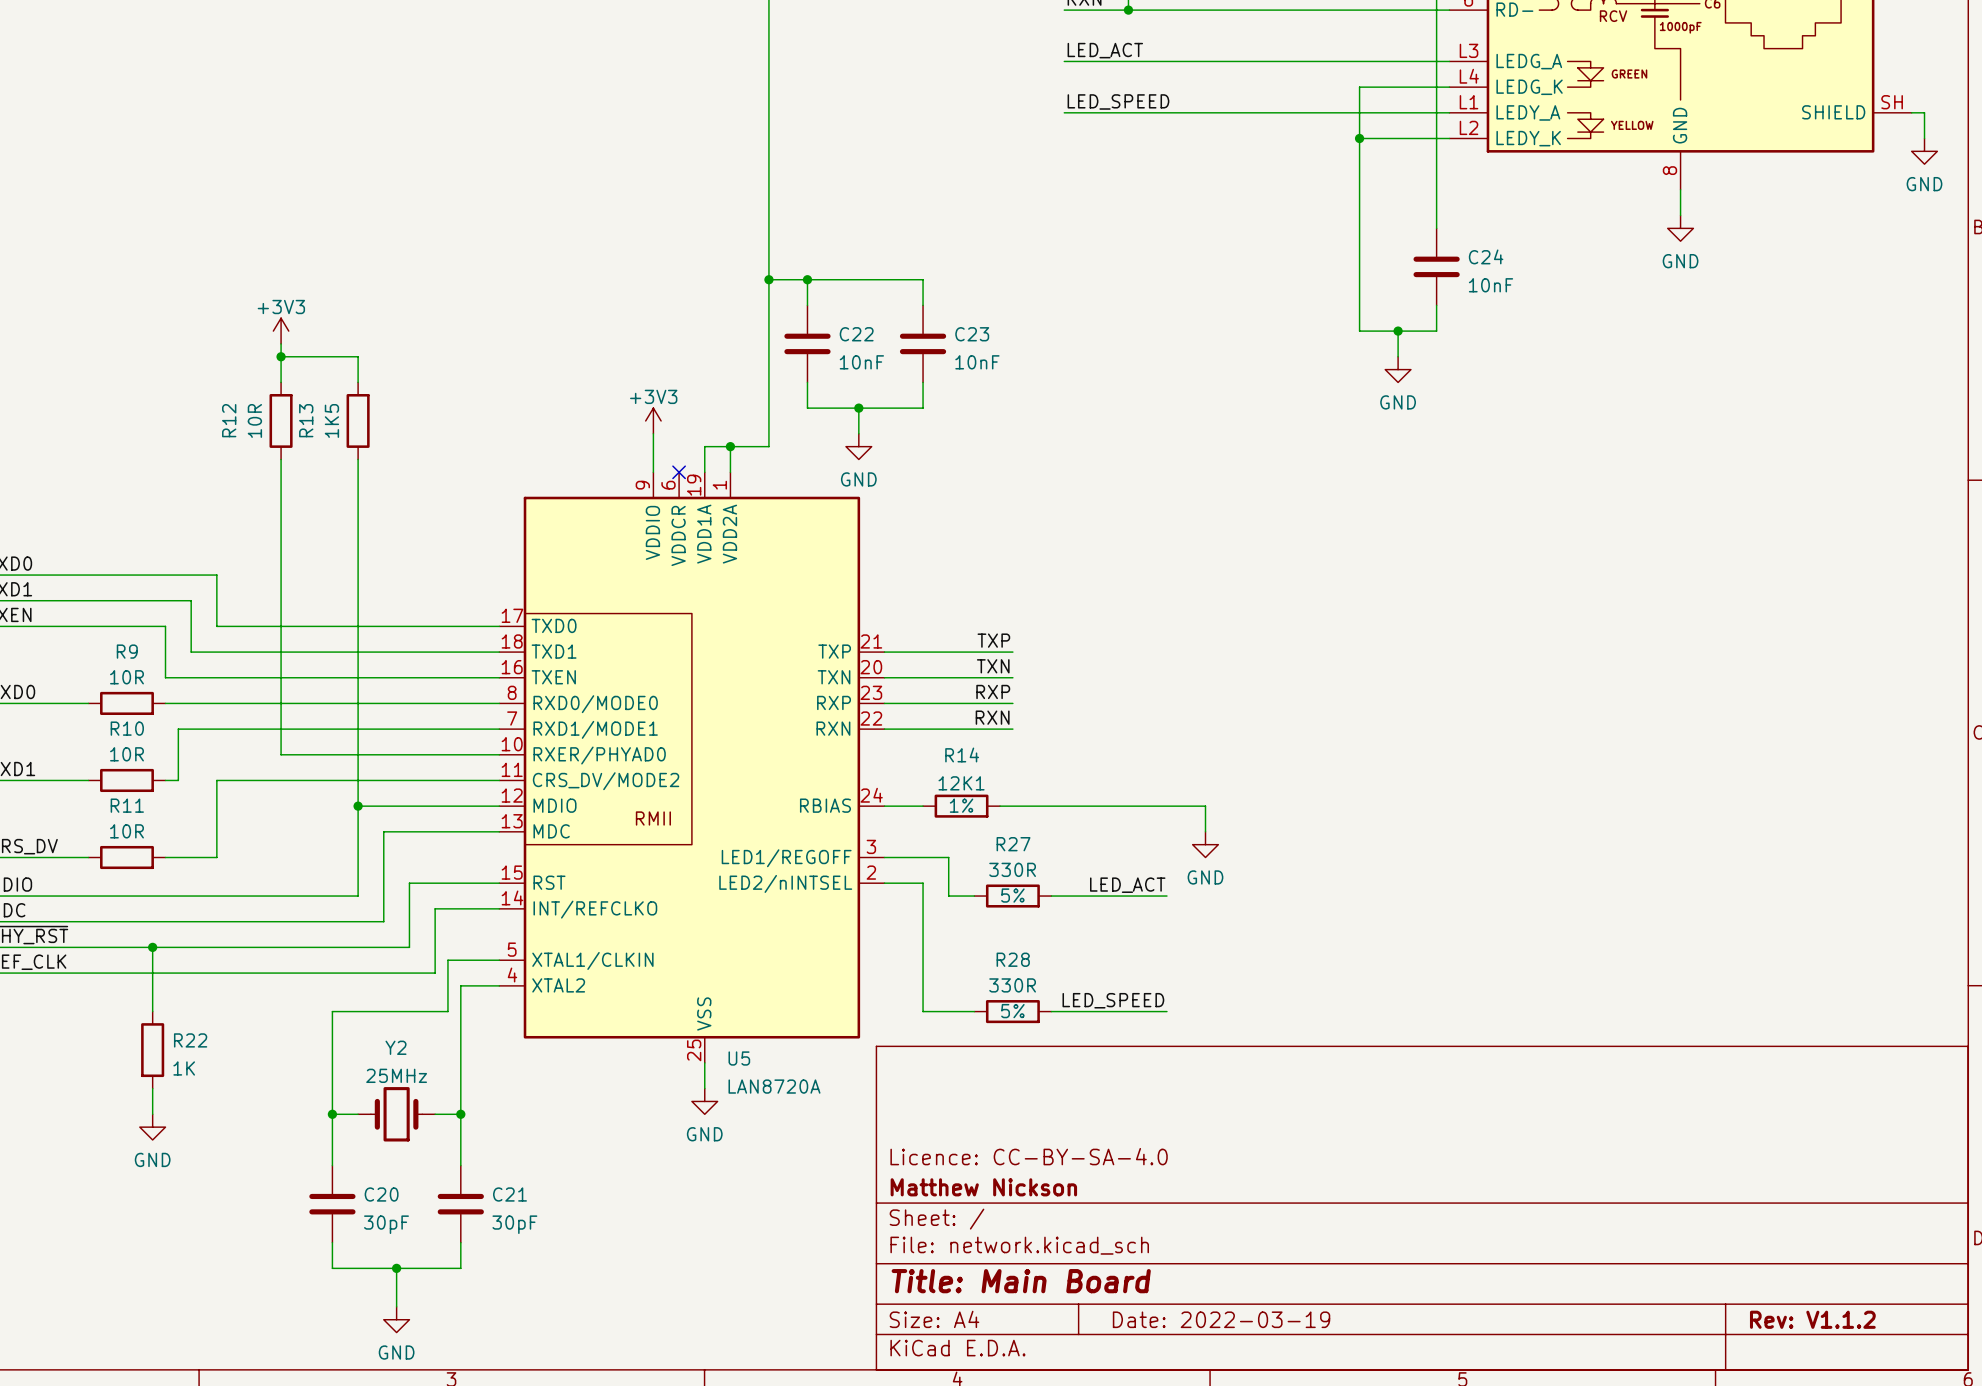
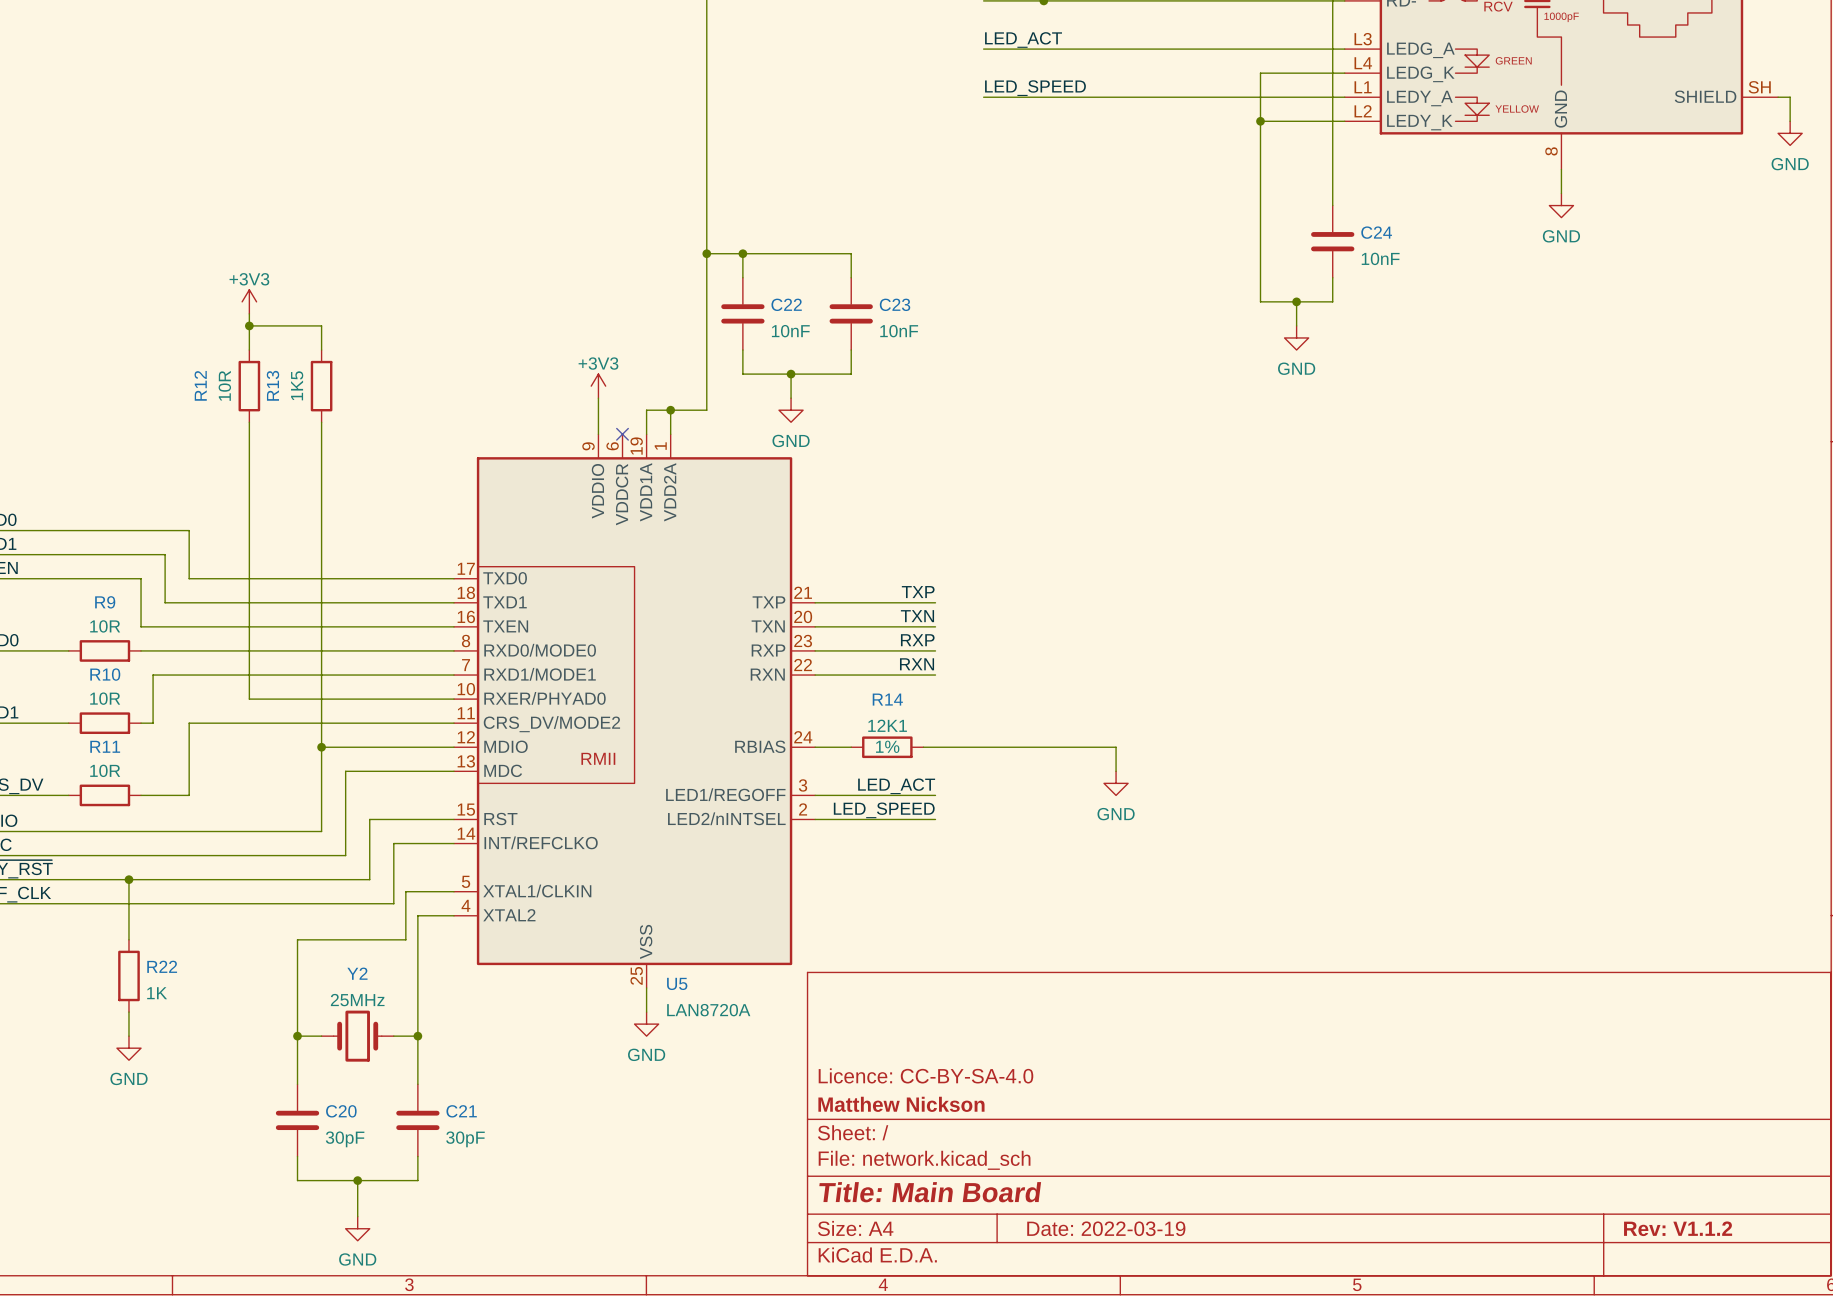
wire: (948, 857) (948, 896) (974, 896) -> (875, 795) (935, 795)
wire: (923, 883) (923, 1011) (974, 1011) -> (851, 819) (935, 819)
label position: LED_ACT (1127, 885) -> LED_ACT (896, 786)
R27: 330R (1012, 896) -> none
wire: (1051, 896) (1166, 896) -> none
label position: LED_SPEED (1113, 1000) -> LED_SPEED (884, 810)
R28: 330R (1012, 1011) -> none
wire: (1051, 1011) (1166, 1011) -> none

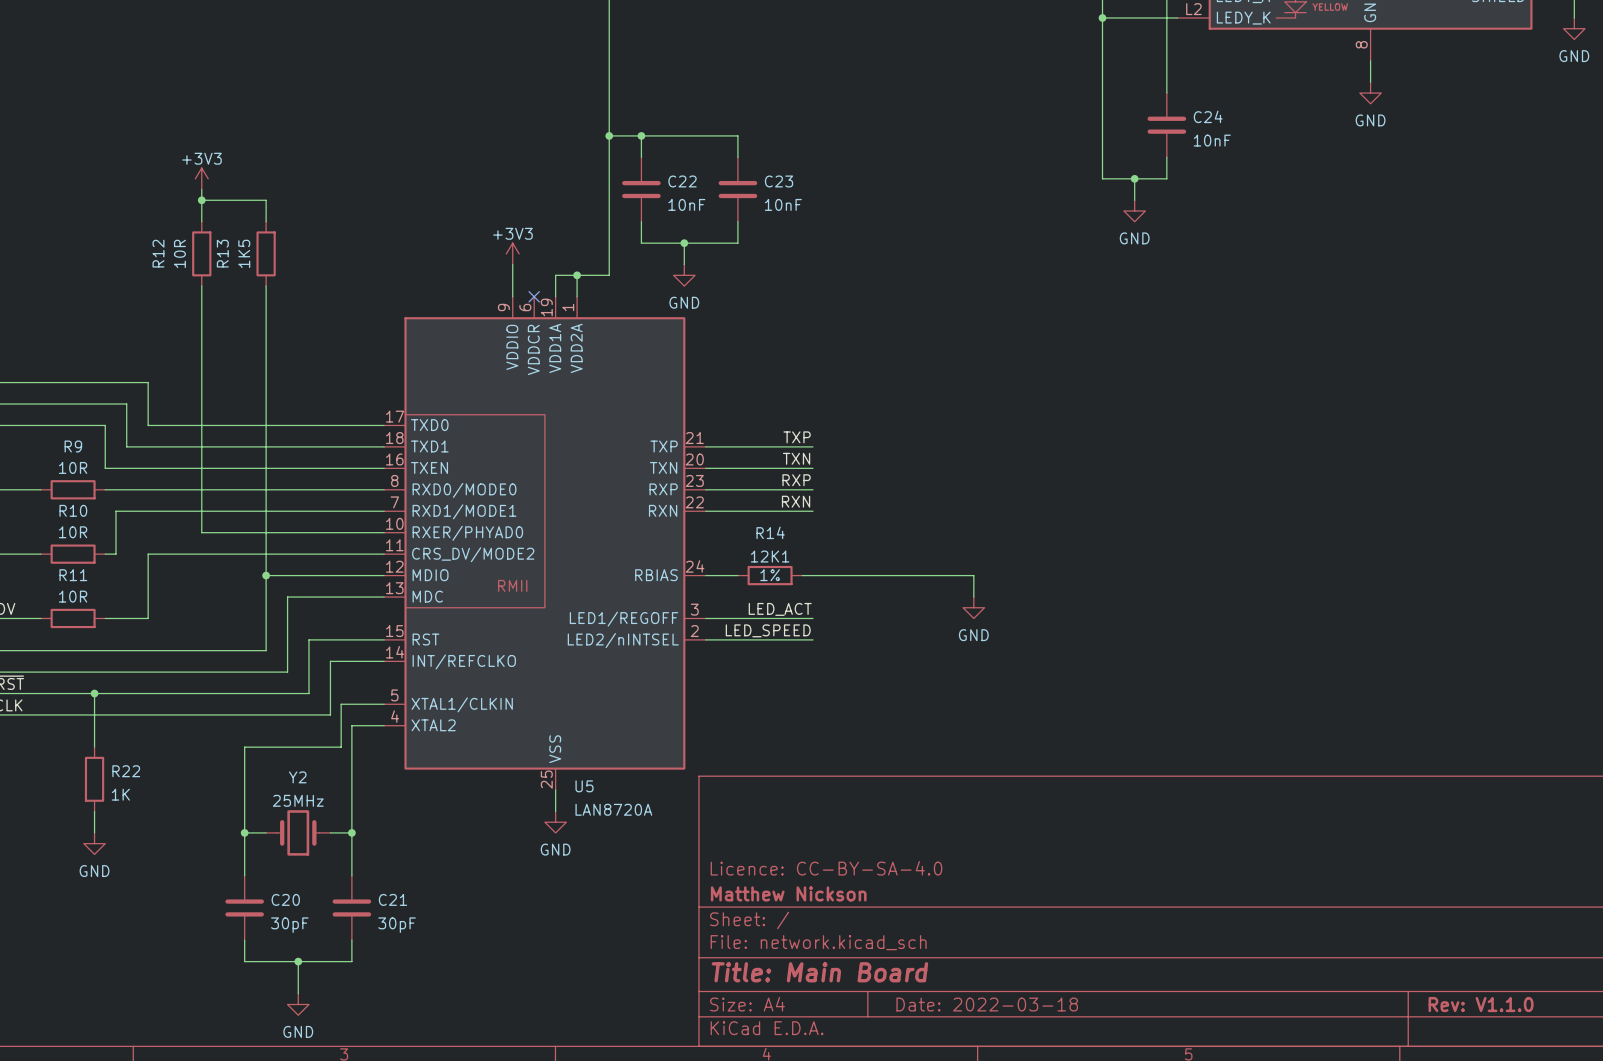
title block: Date: 2022-03-19 (1106, 1228) -> Date: 2022-03-18 (987, 1004)
title block: Rev: V1.1.2 (1678, 1228) -> Rev: V1.1.0 (1481, 1004)

